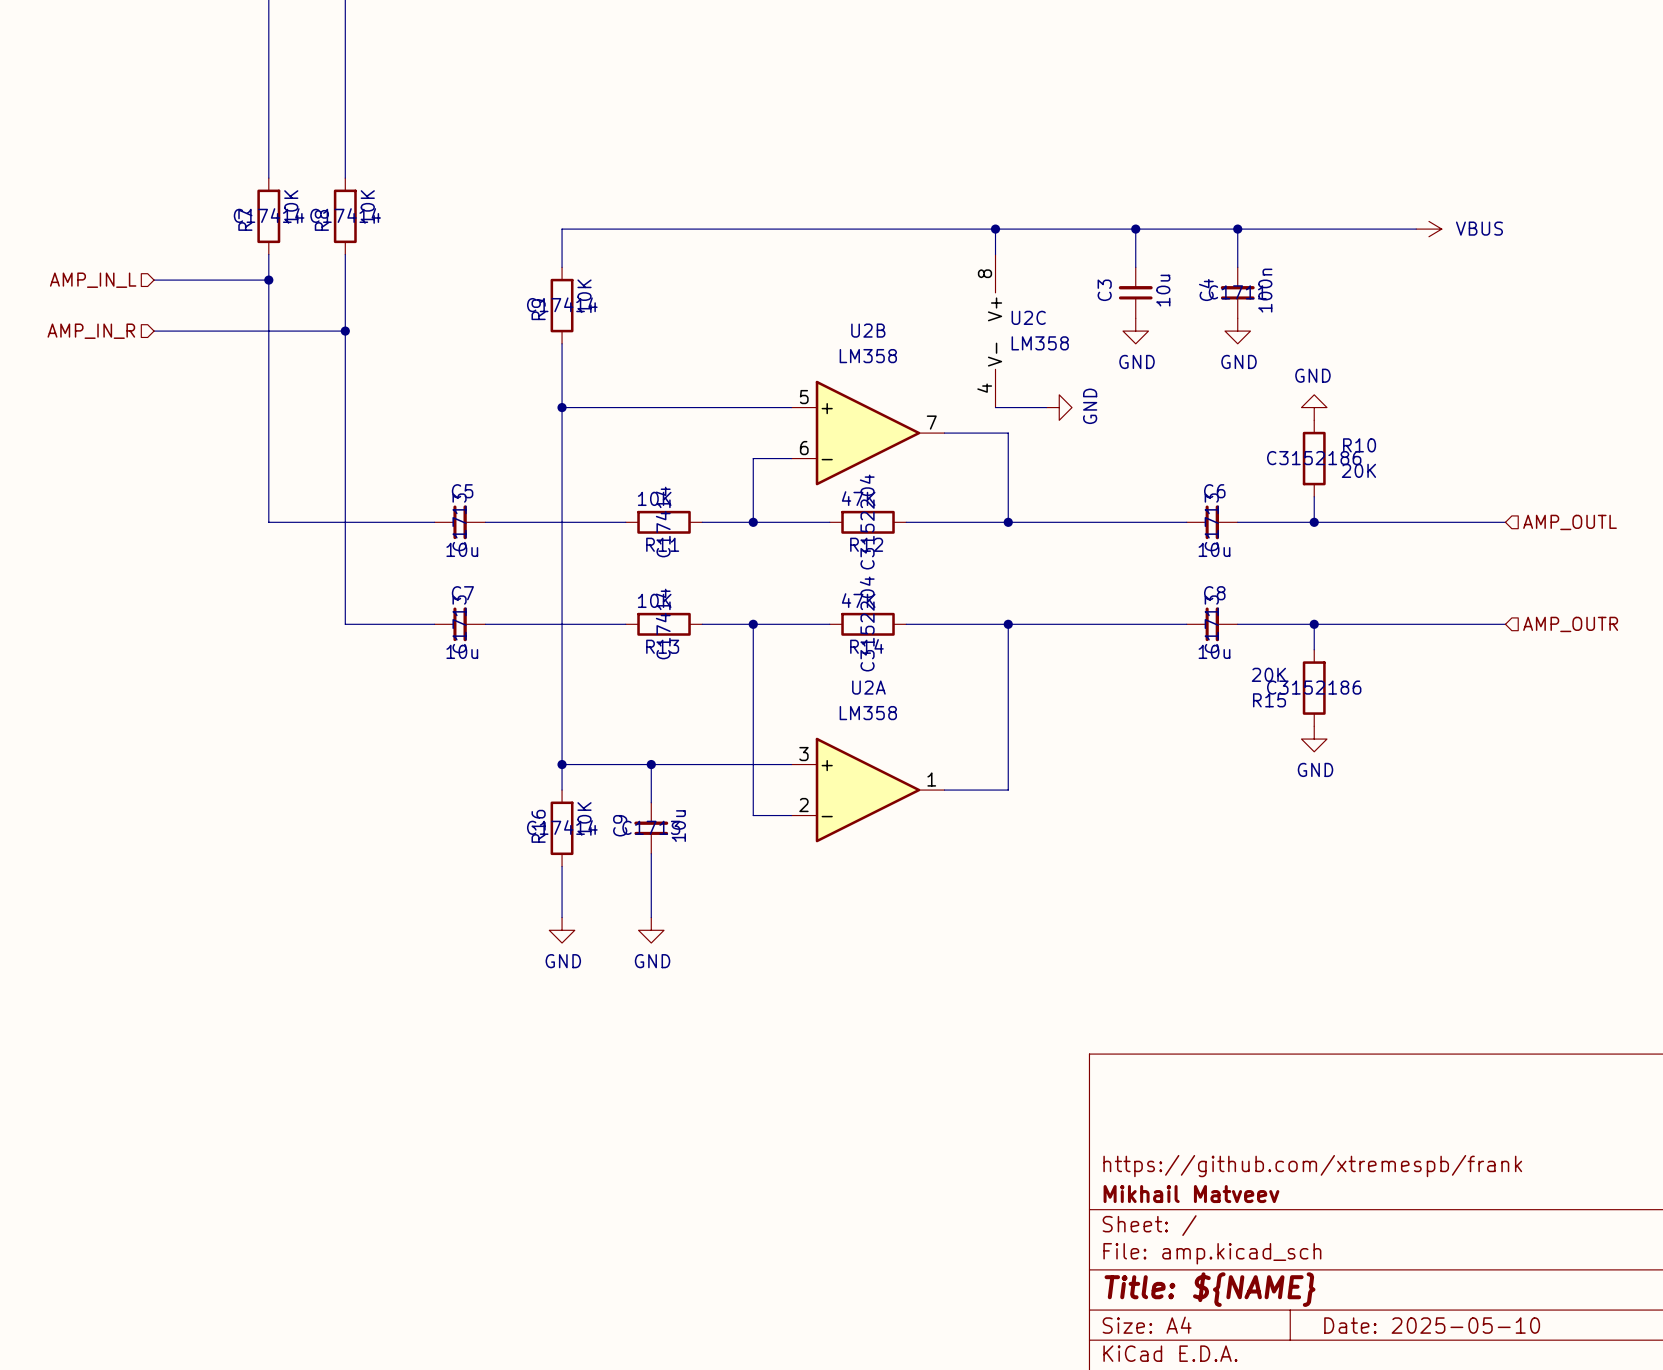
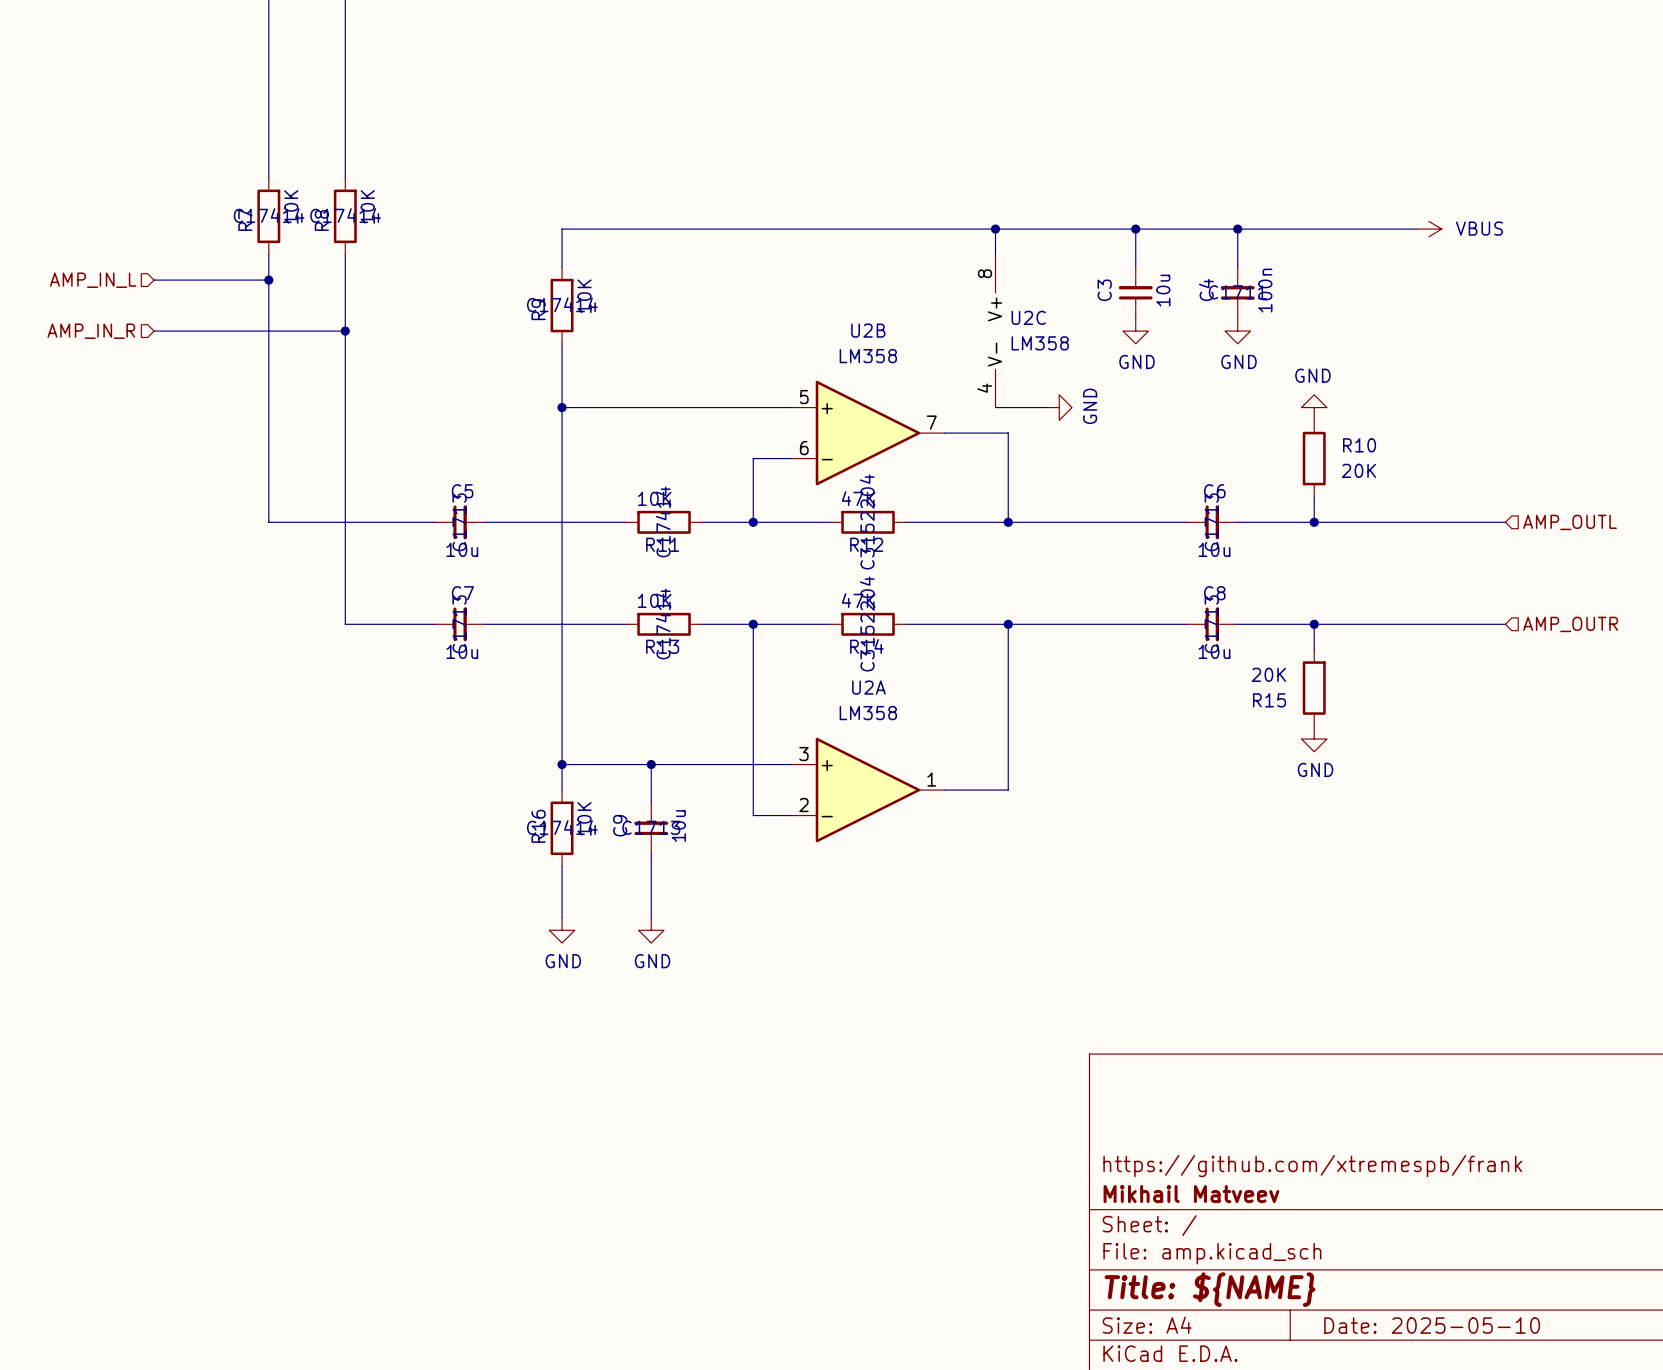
R10 text: C3152186 (1314, 458) -> none
R15 text: C3152186 (1314, 687) -> none

